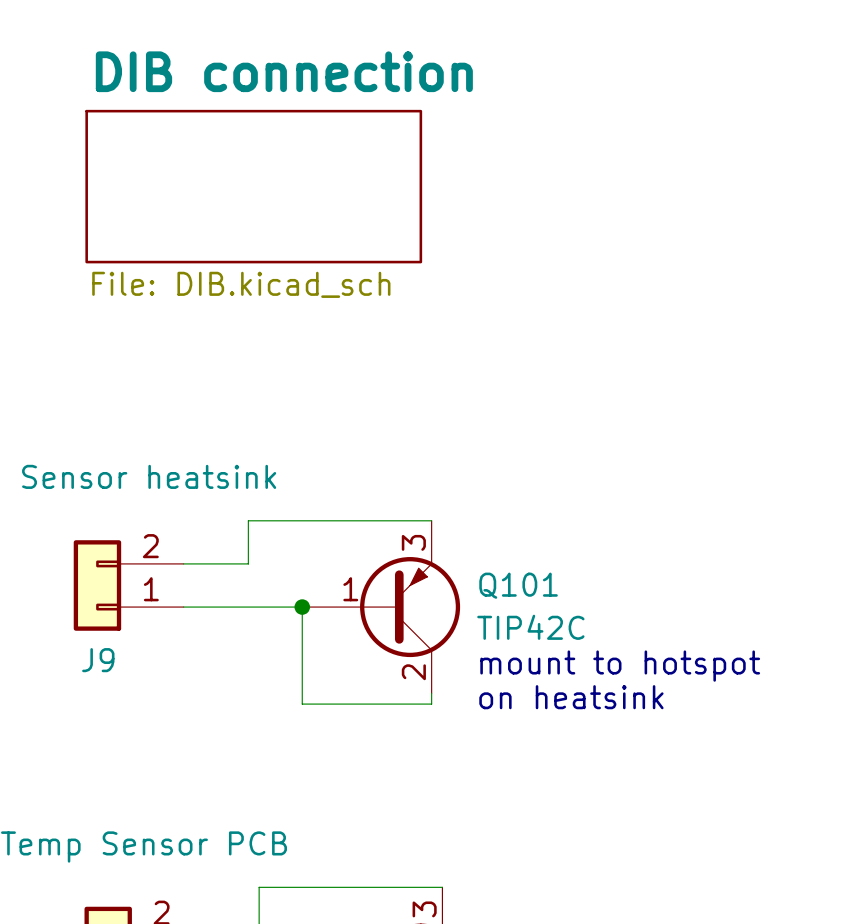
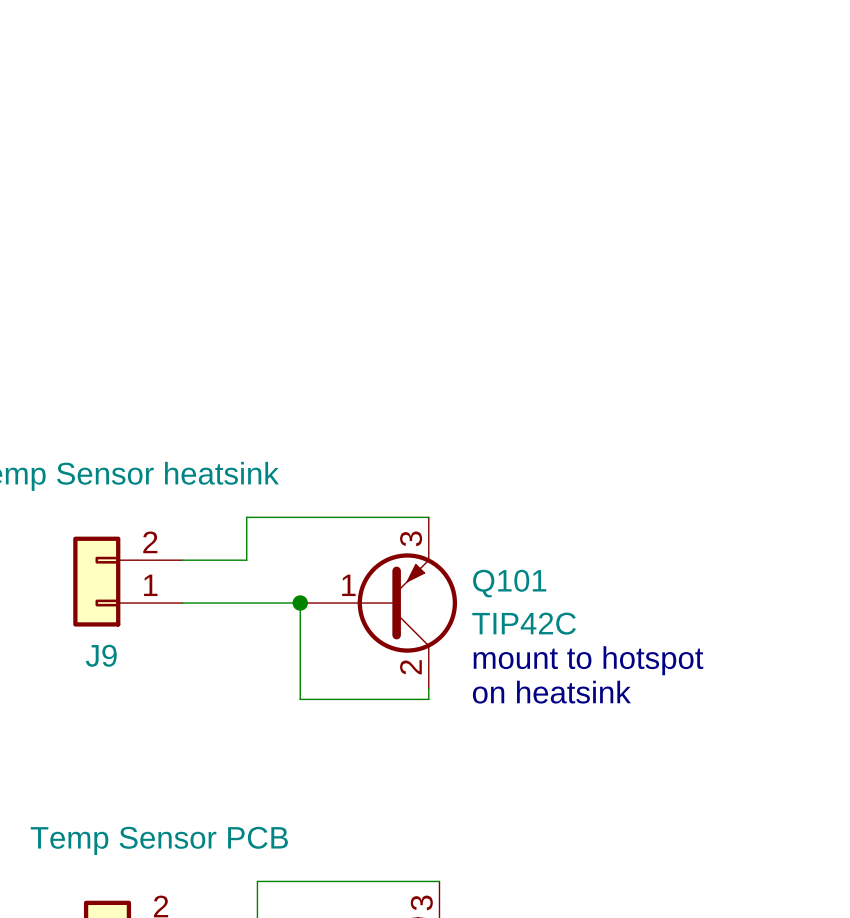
sheet DIB connection: File: DIB.kicad_sch (253, 186) -> none

